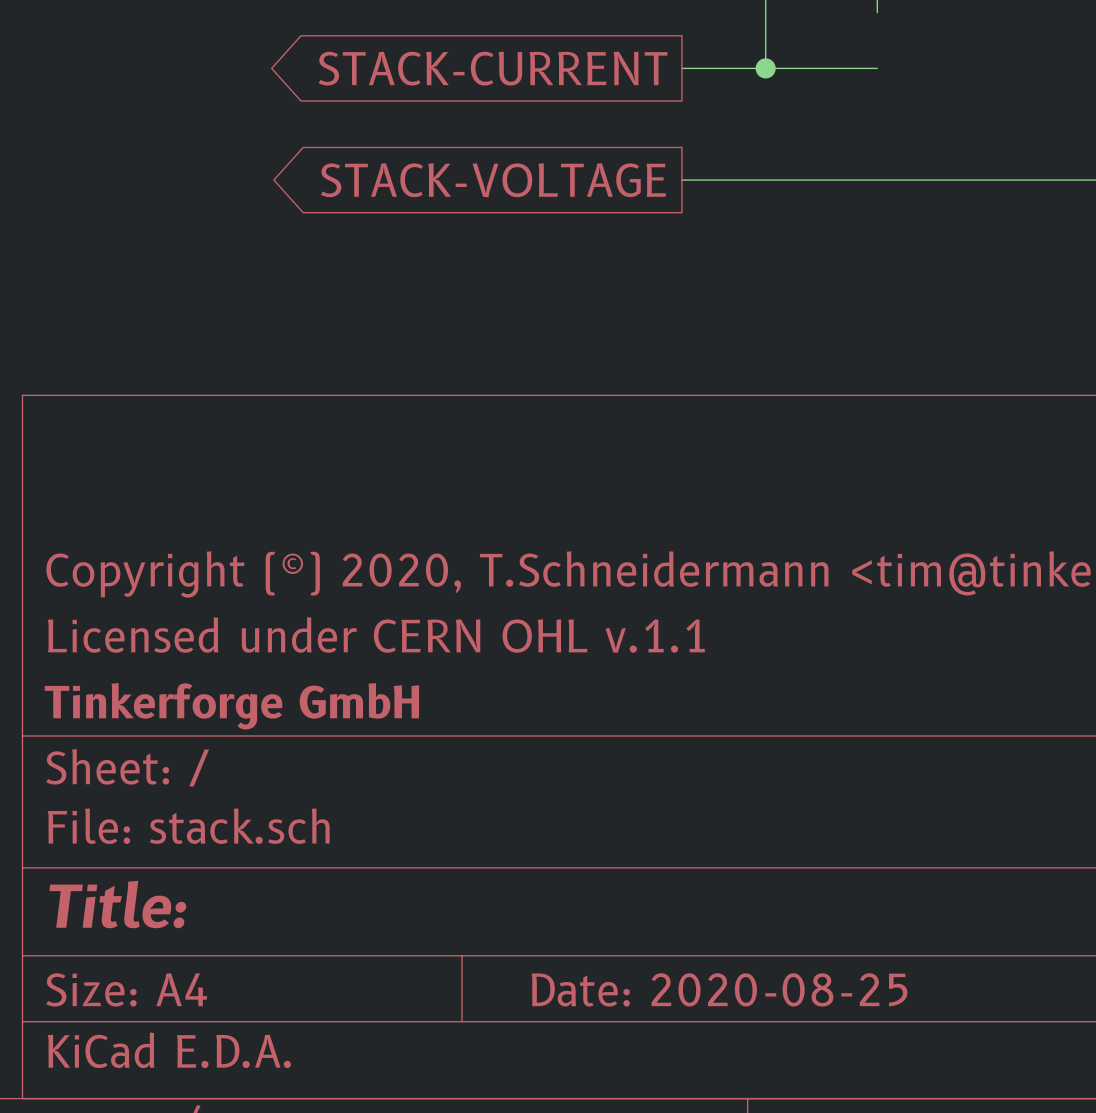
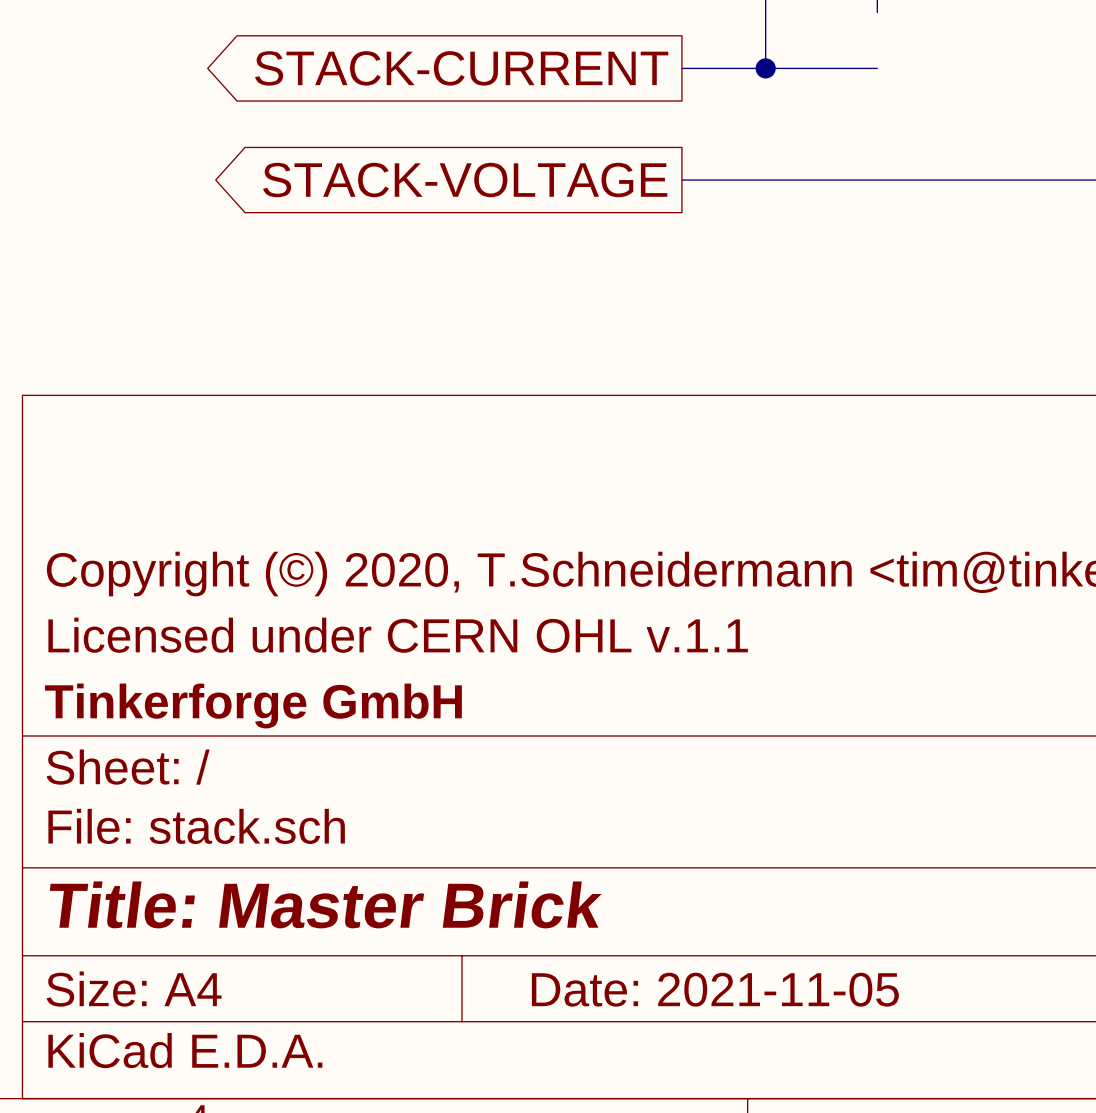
title block: Title: (117, 904) -> Title: Master Brick (325, 904)
title block: Date: 2020-08-25 (719, 989) -> Date: 2021-11-05 (715, 989)

